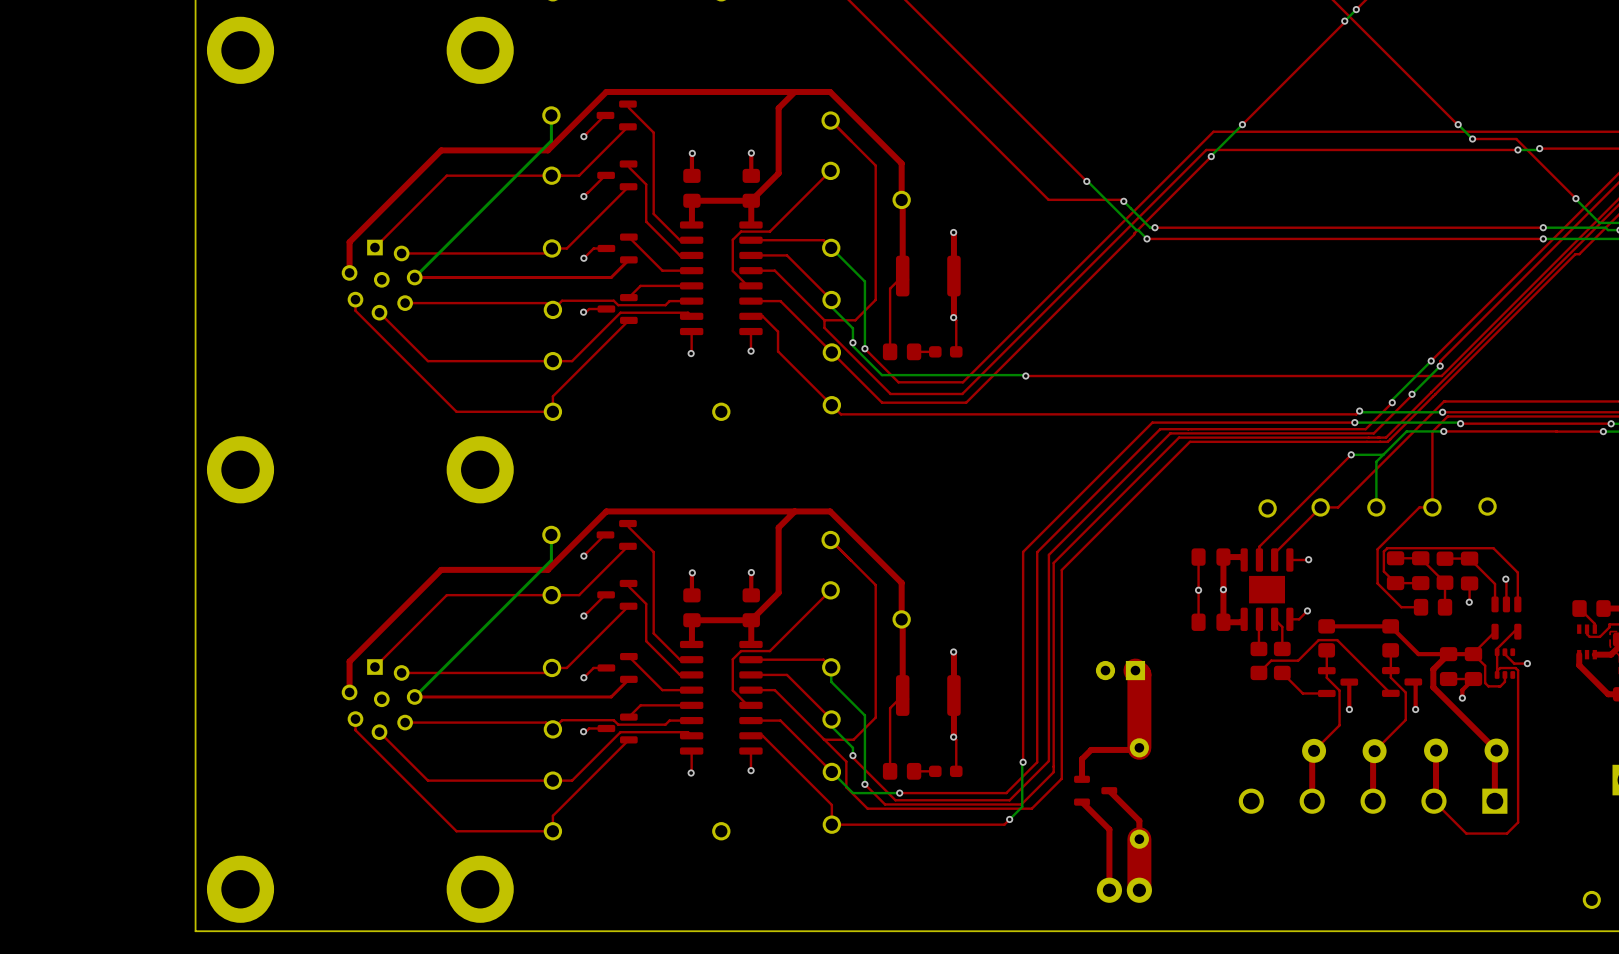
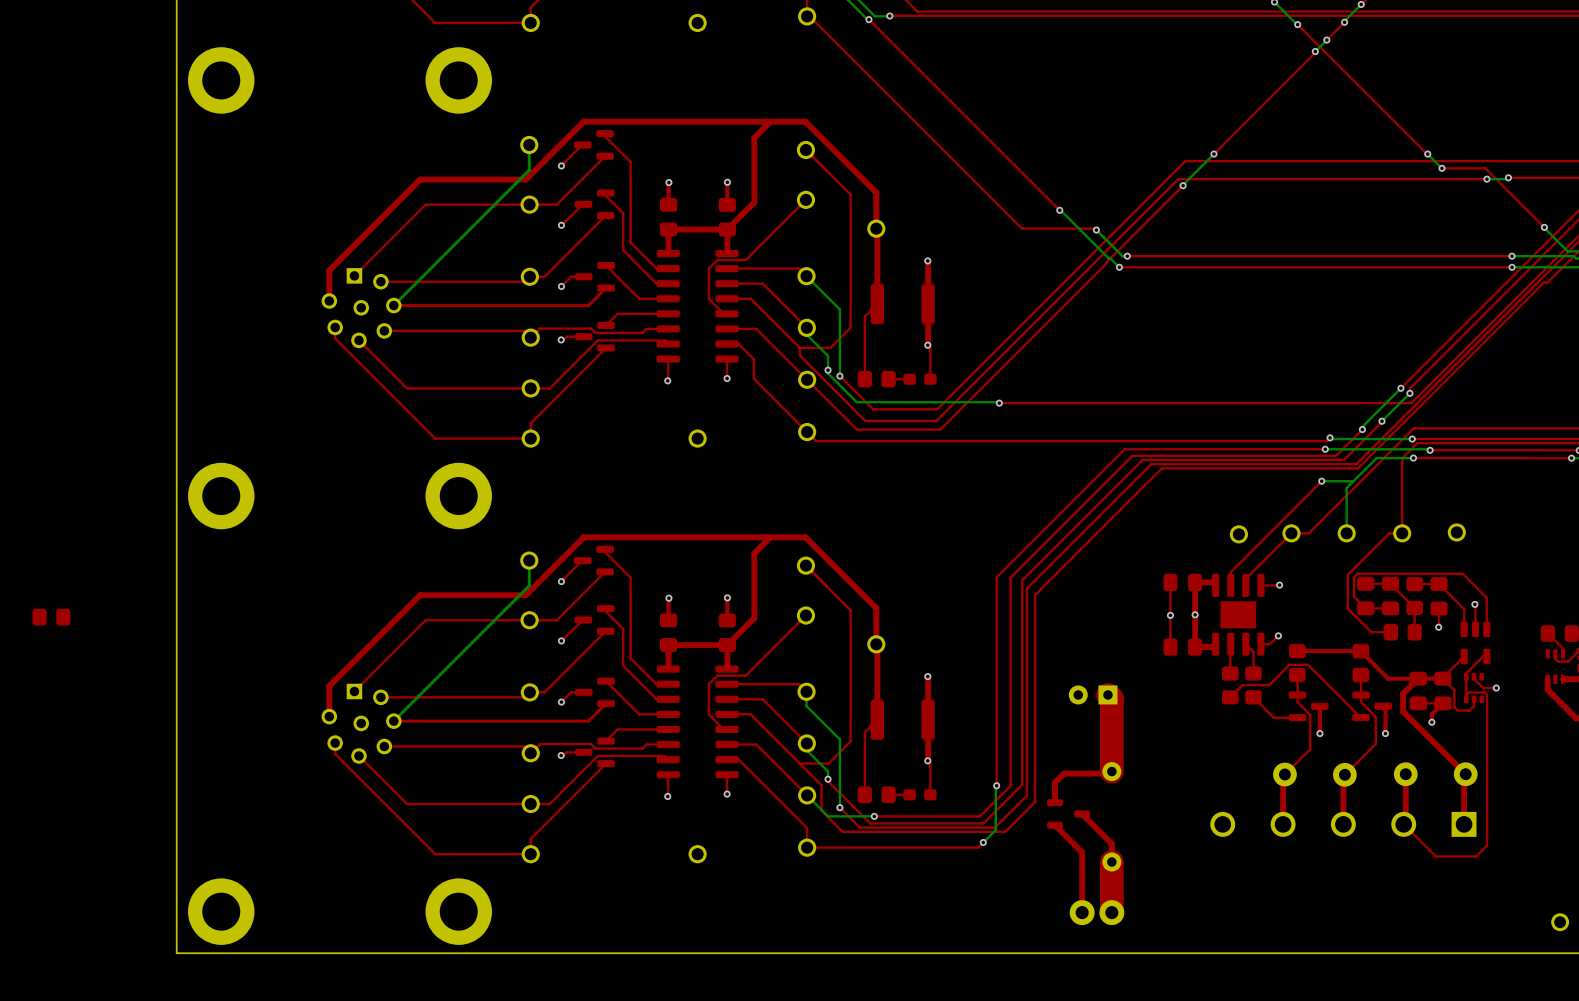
part: none -> (51, 617)

